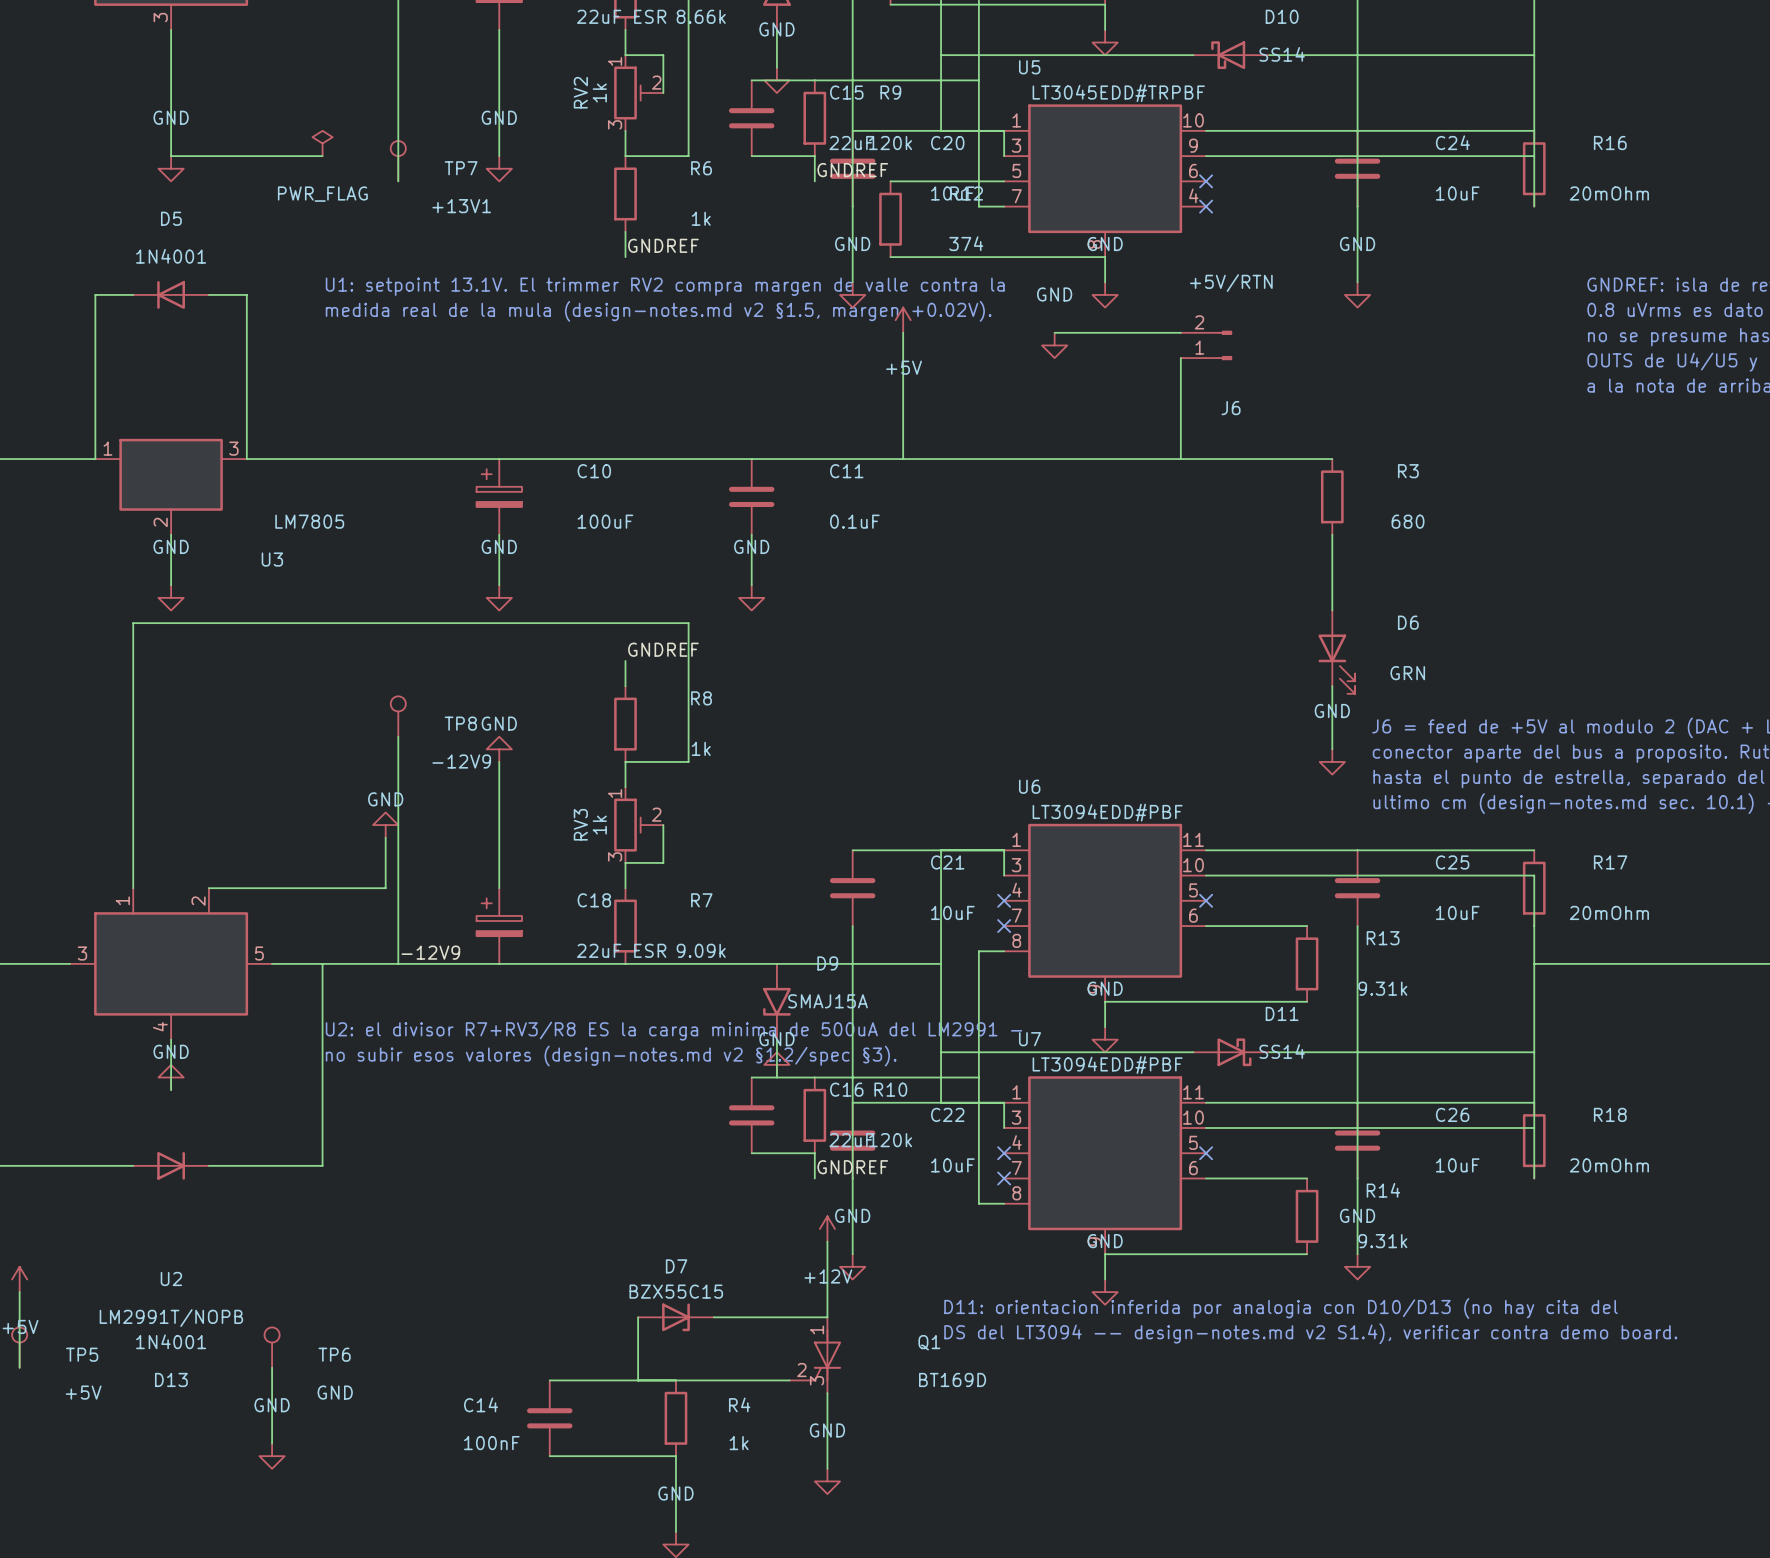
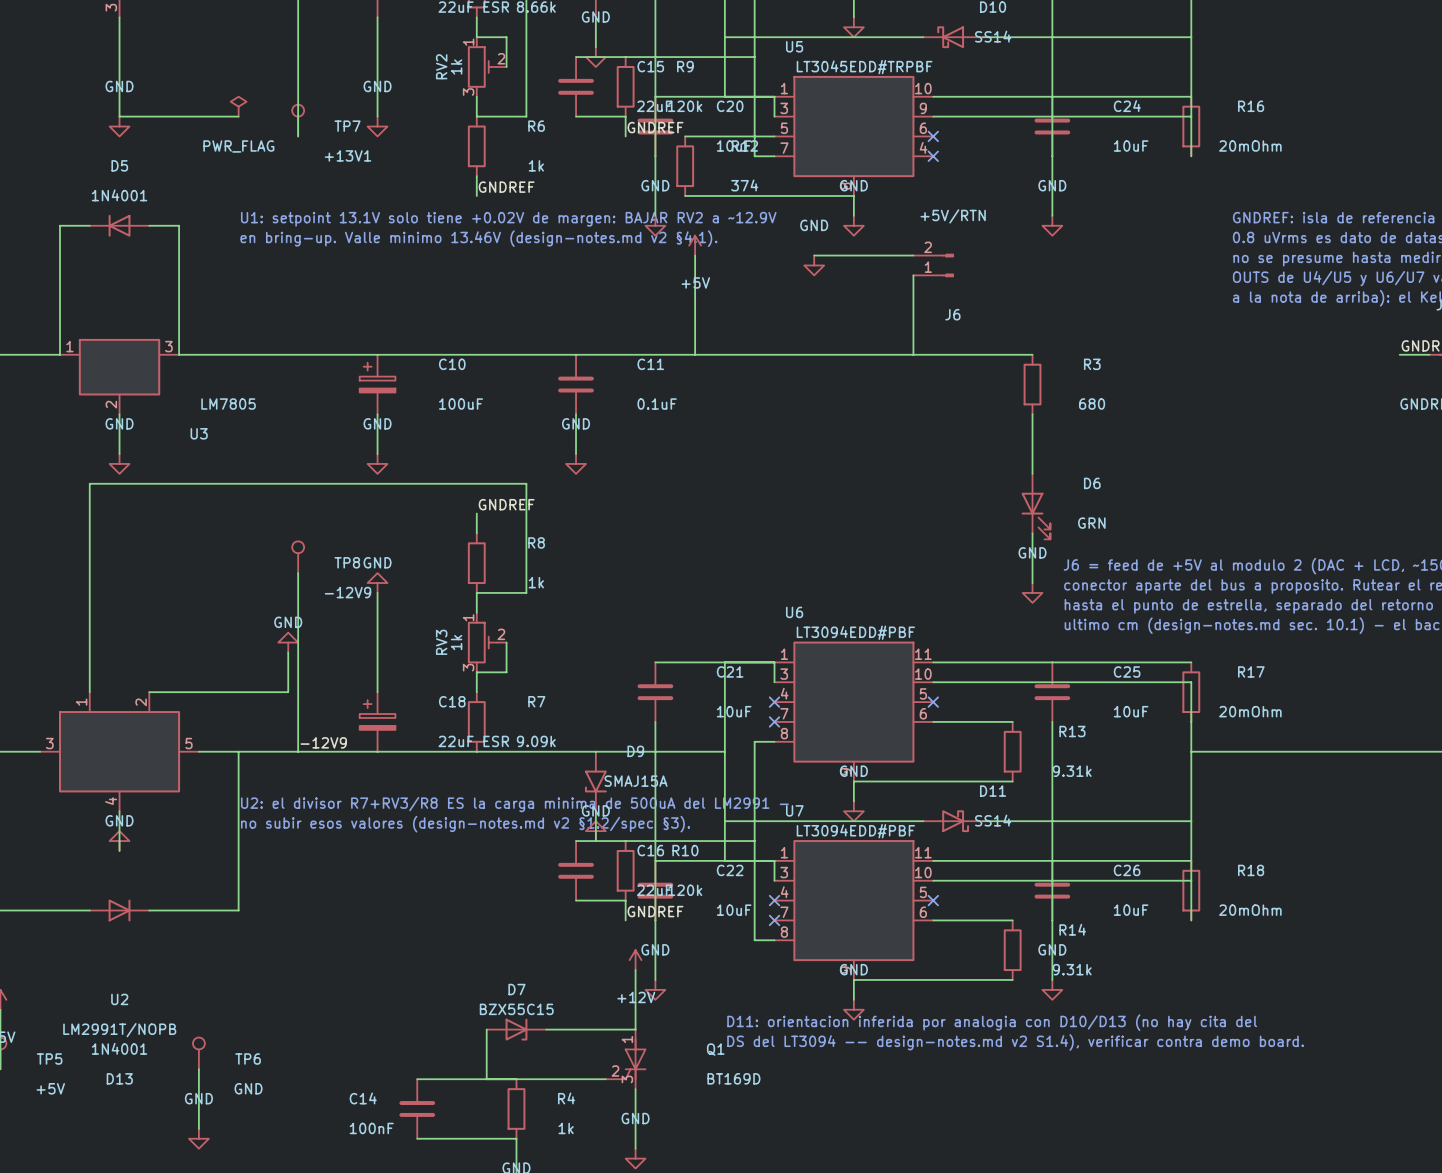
text: U1: setpoint 13.1V. El trimmer RV2 compra margen de valle contra la (665, 286) -> U1: setpoint 13.1V solo tiene +0.02V de margen: BAJAR RV2 a ~12.9V (508, 219)
text: medida real de la mula (design-notes.md v2 §1.5, margen +0.02V). (658, 311) -> en bring-up. Valle minimo 13.46V (design-notes.md v2 §4.1). (478, 238)

